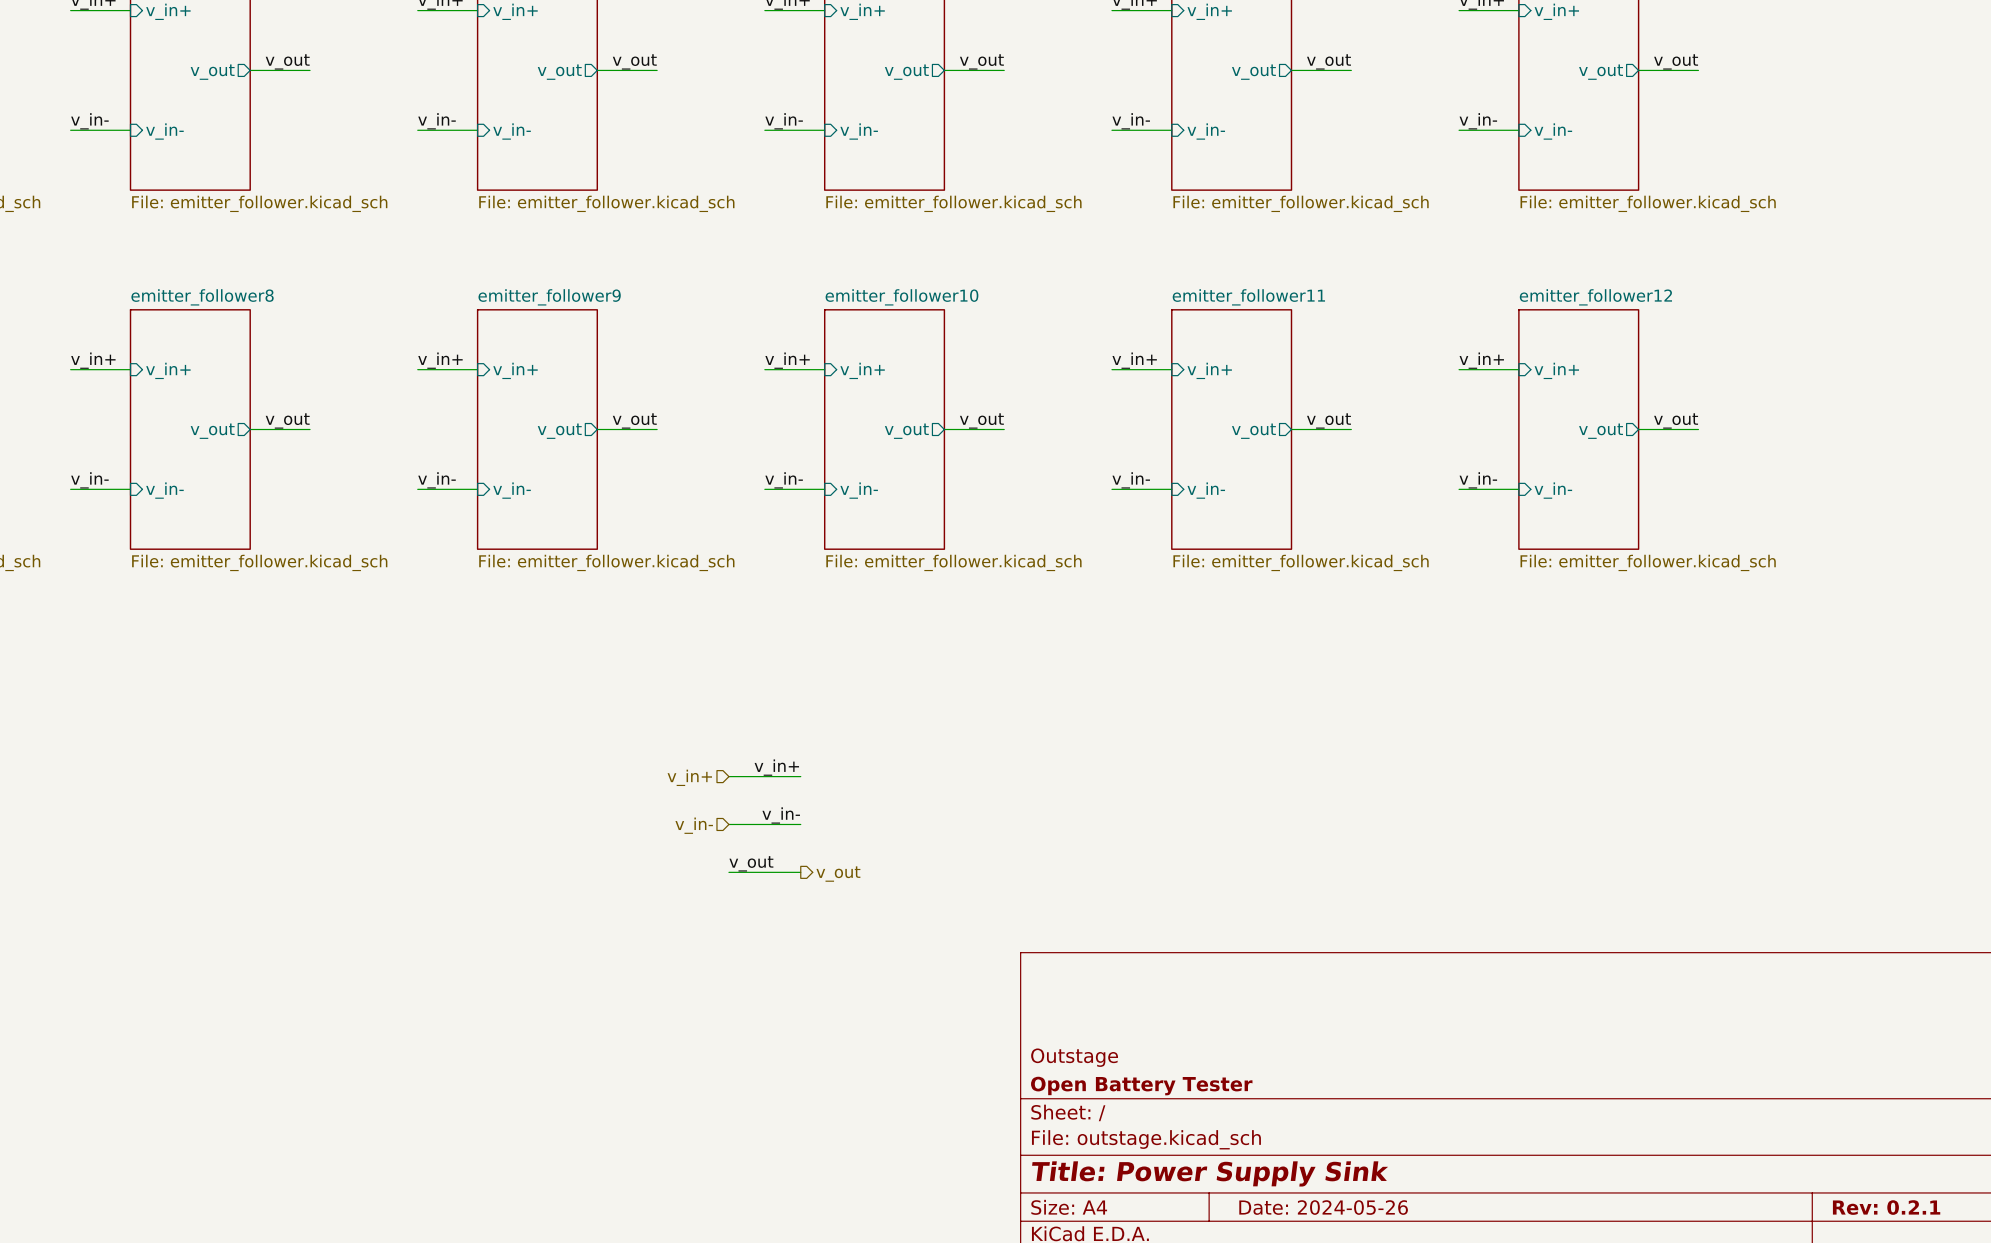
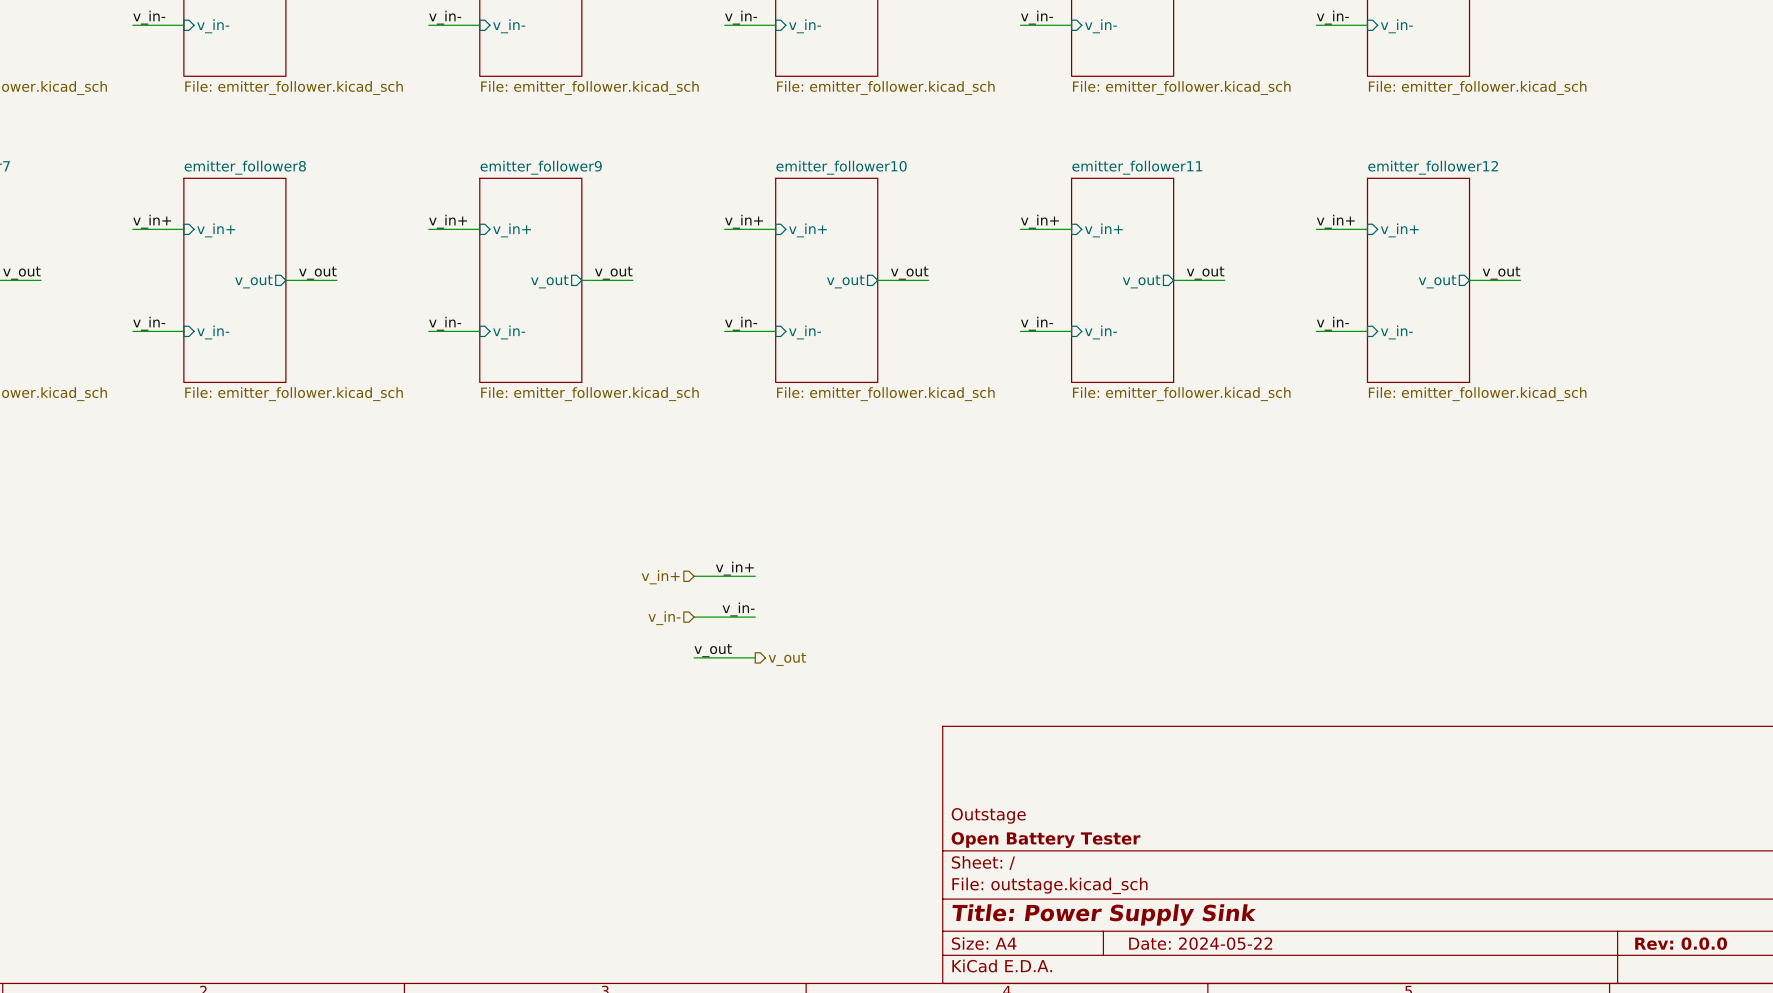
title block: Date: 2024-05-26 (1323, 1207) -> Date: 2024-05-22 (1200, 943)
title block: Rev: 0.2.1 (1886, 1207) -> Rev: 0.0.0 (1681, 943)

